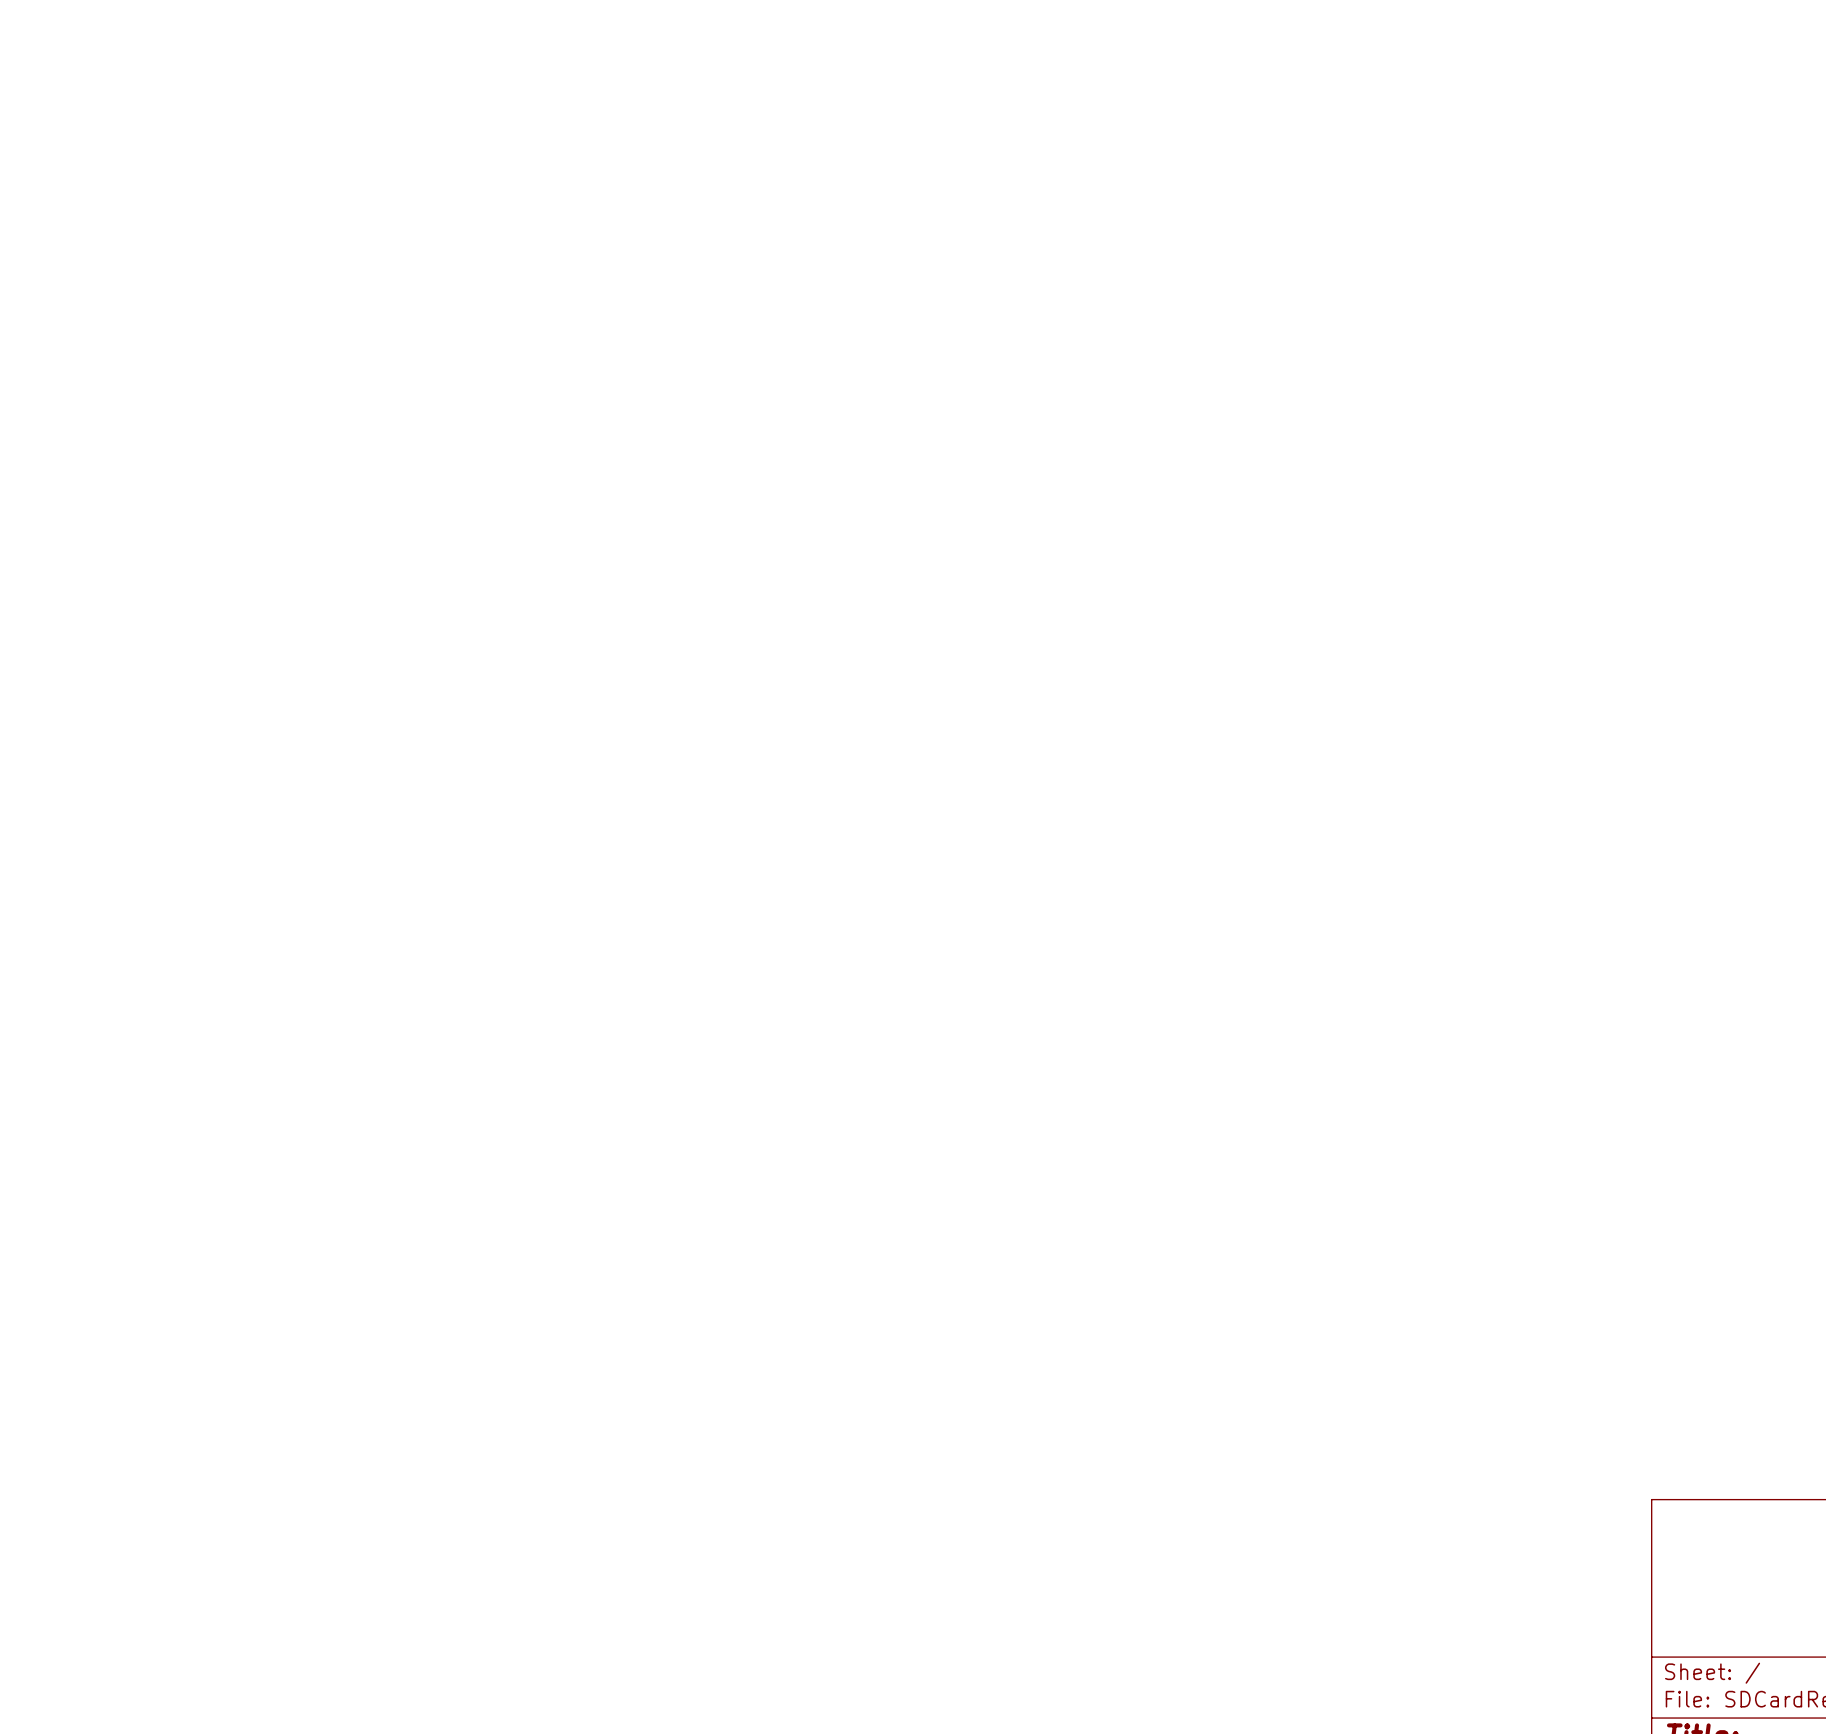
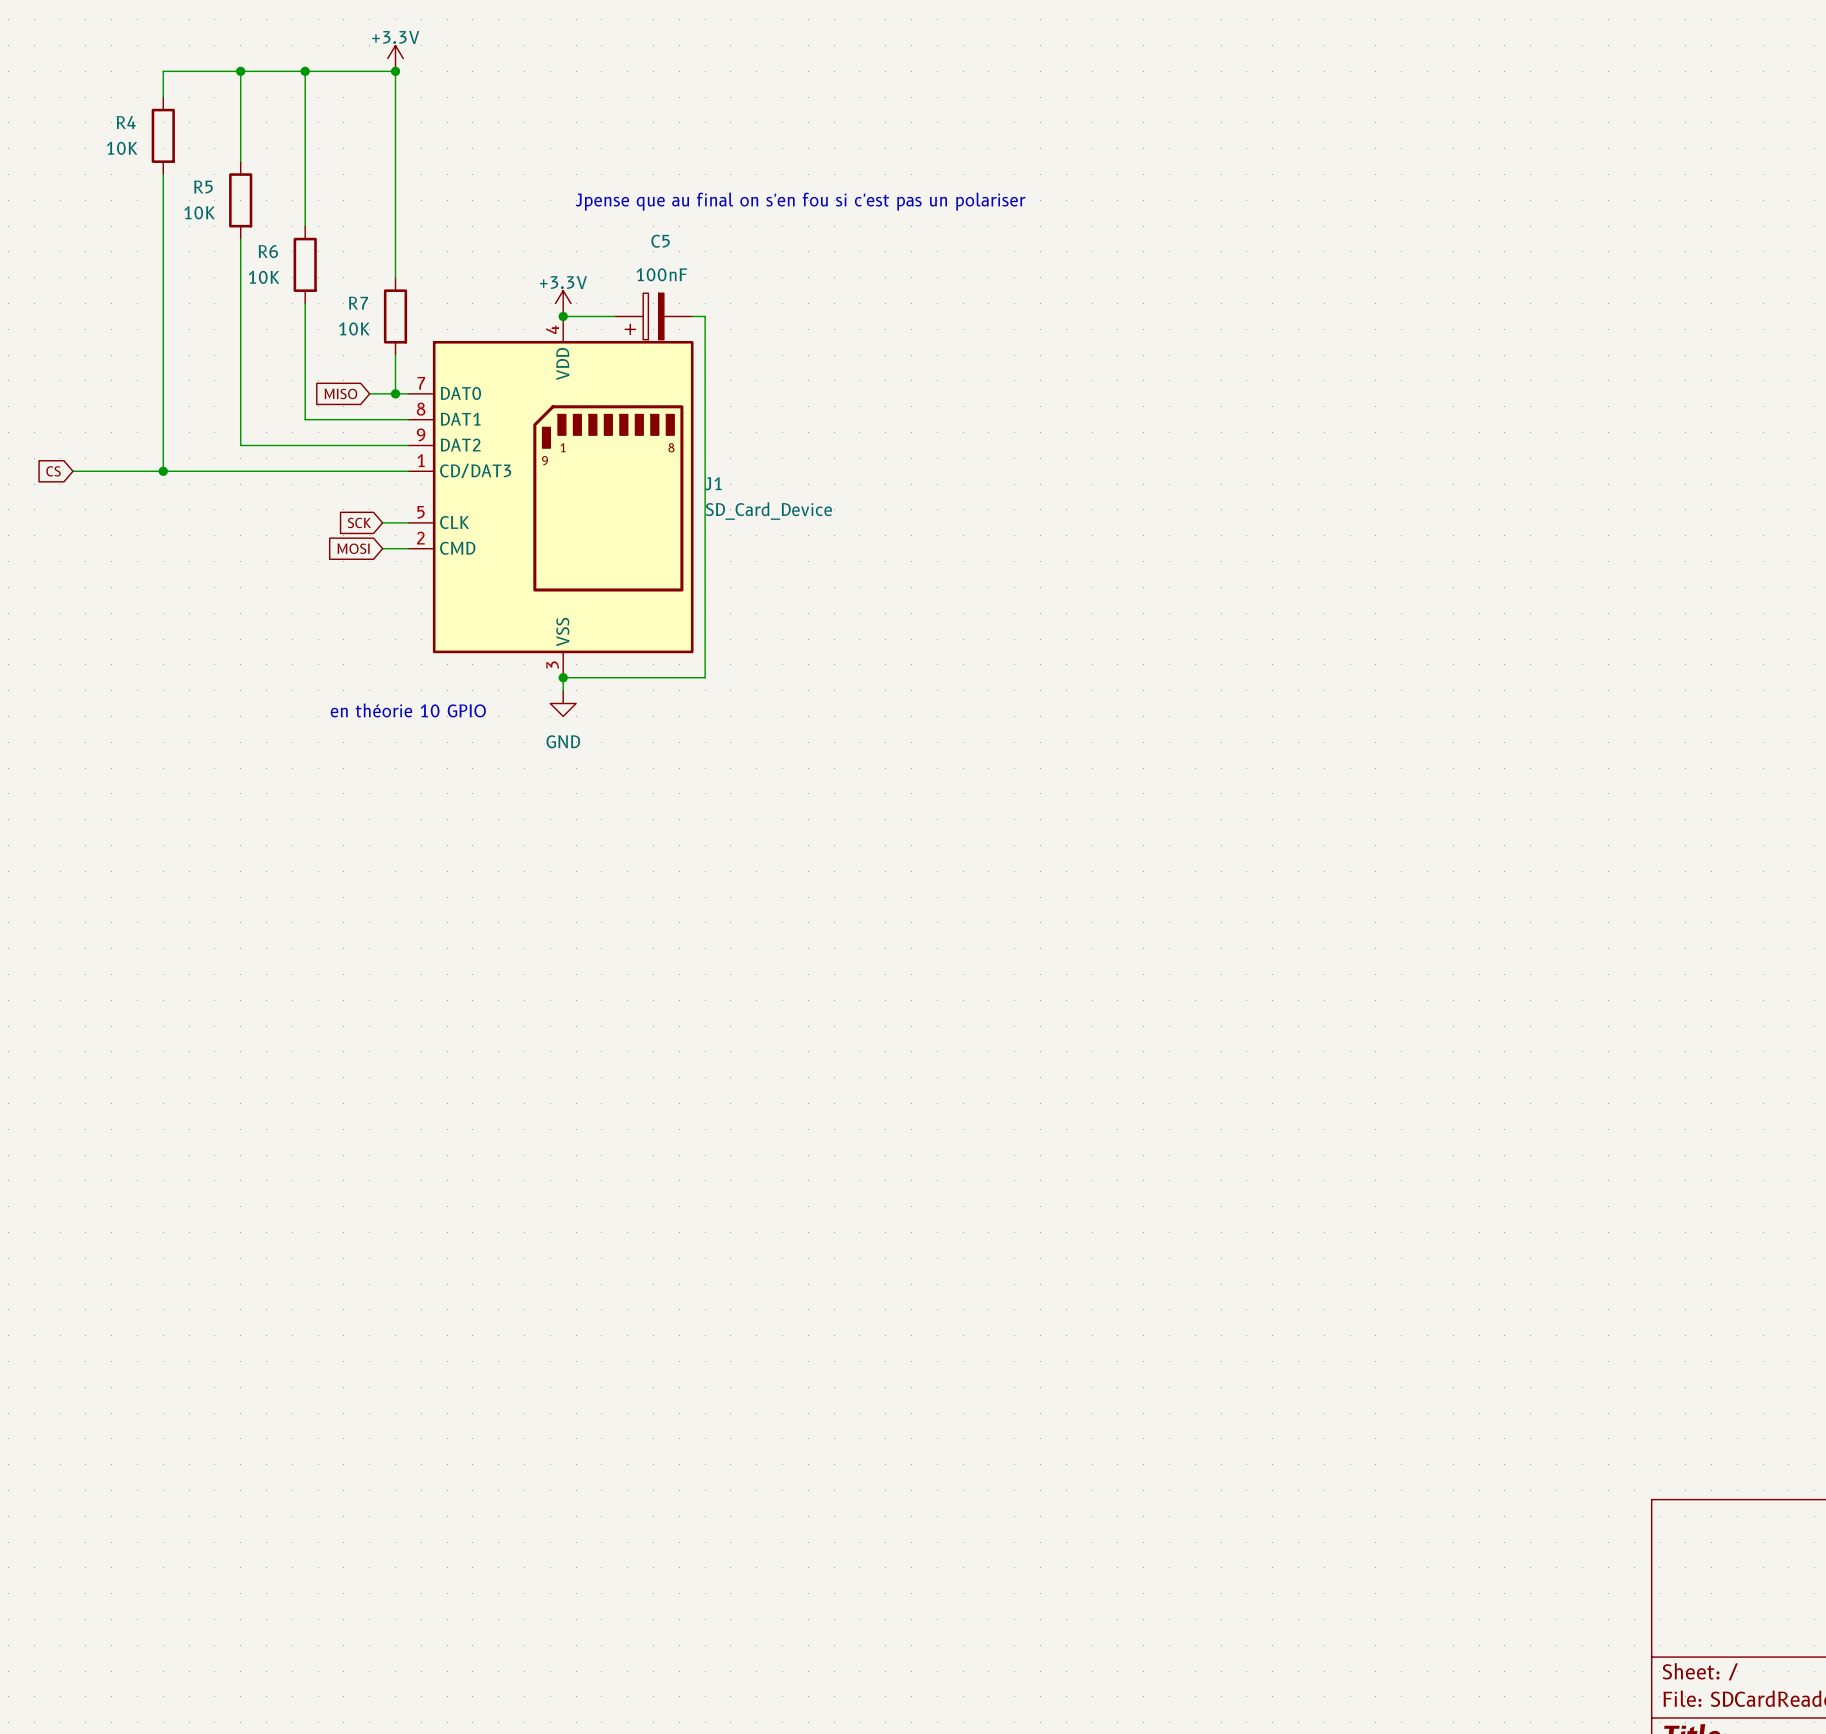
power symbol: none -> +3.3V (395, 58)
wire: none -> (240, 71) (240, 161)
junction: none -> (240, 71)
wire: none -> (305, 71) (305, 226)
junction: none -> (305, 71)
junction: none -> (395, 71)
wire: none -> (163, 97) (163, 71) (395, 71) (395, 277)
R4: none -> 10K (163, 135)
wire: none -> (163, 174) (163, 471)
R5: none -> 10K (240, 200)
text: none -> Jpense que au final on s'en fou si c'est pas un polariser (800, 201)
wire: none -> (240, 239) (240, 445) (408, 445)
R6: none -> 10K (305, 264)
wire: none -> (305, 303) (305, 419) (408, 419)
power symbol: none -> +3.3V (563, 303)
R7: none -> 10K (395, 316)
wire: none -> (563, 316) (614, 316)
junction: none -> (563, 316)
C5: none -> 100nF (653, 316)
wire: none -> (692, 316) (705, 316) (705, 677) (563, 677) (563, 690)
wire: none -> (395, 355) (395, 393)
global label: none -> MISO (340, 393)
wire: none -> (369, 393) (408, 393)
junction: none -> (395, 393)
global label: none -> CS (53, 471)
wire: none -> (72, 471) (408, 471)
junction: none -> (163, 471)
J1: none -> SD_Card_Device (550, 497)
global label: none -> SCK (359, 522)
wire: none -> (382, 522) (408, 522)
global label: none -> MOSI (353, 548)
wire: none -> (382, 548) (408, 548)
junction: none -> (563, 677)
power symbol: none -> GND (563, 703)
text: none -> en théorie 10 GPIO (408, 710)

